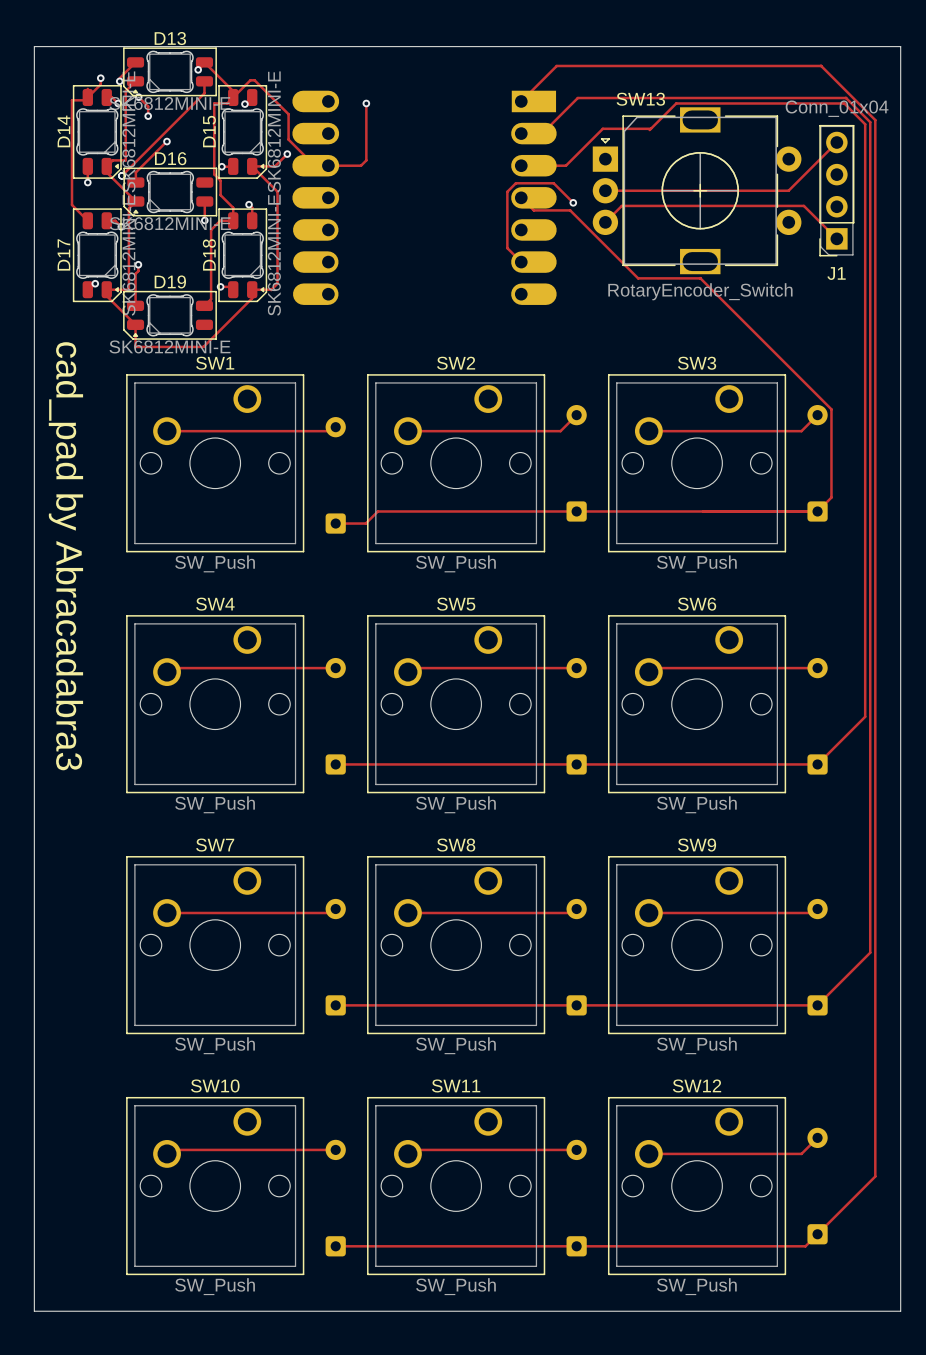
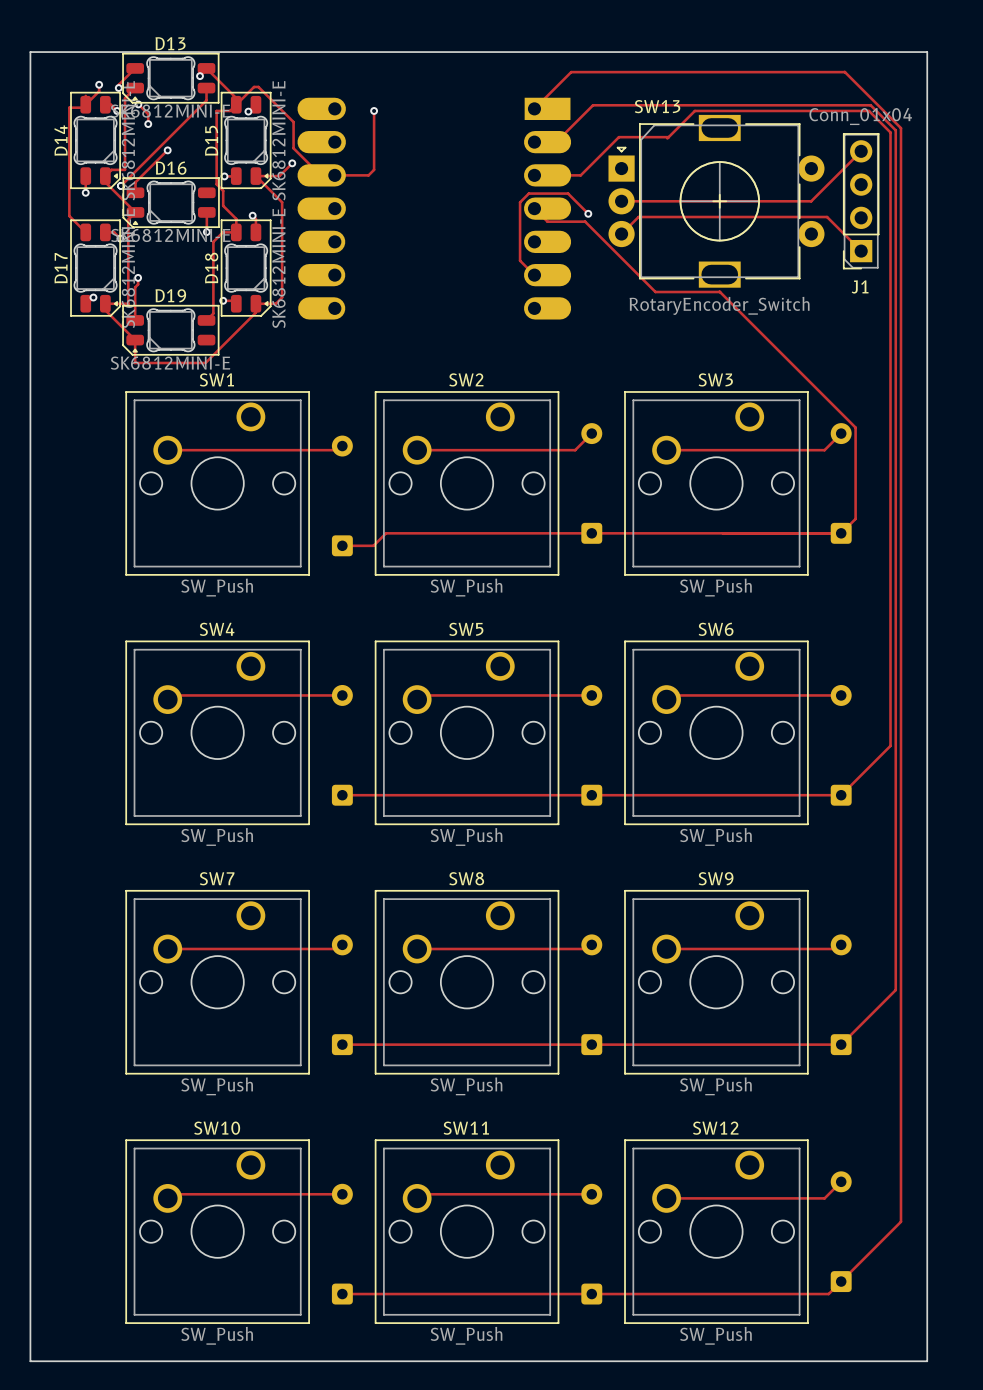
text: cad_pad by Abracadabra3 (65, 556) -> none

